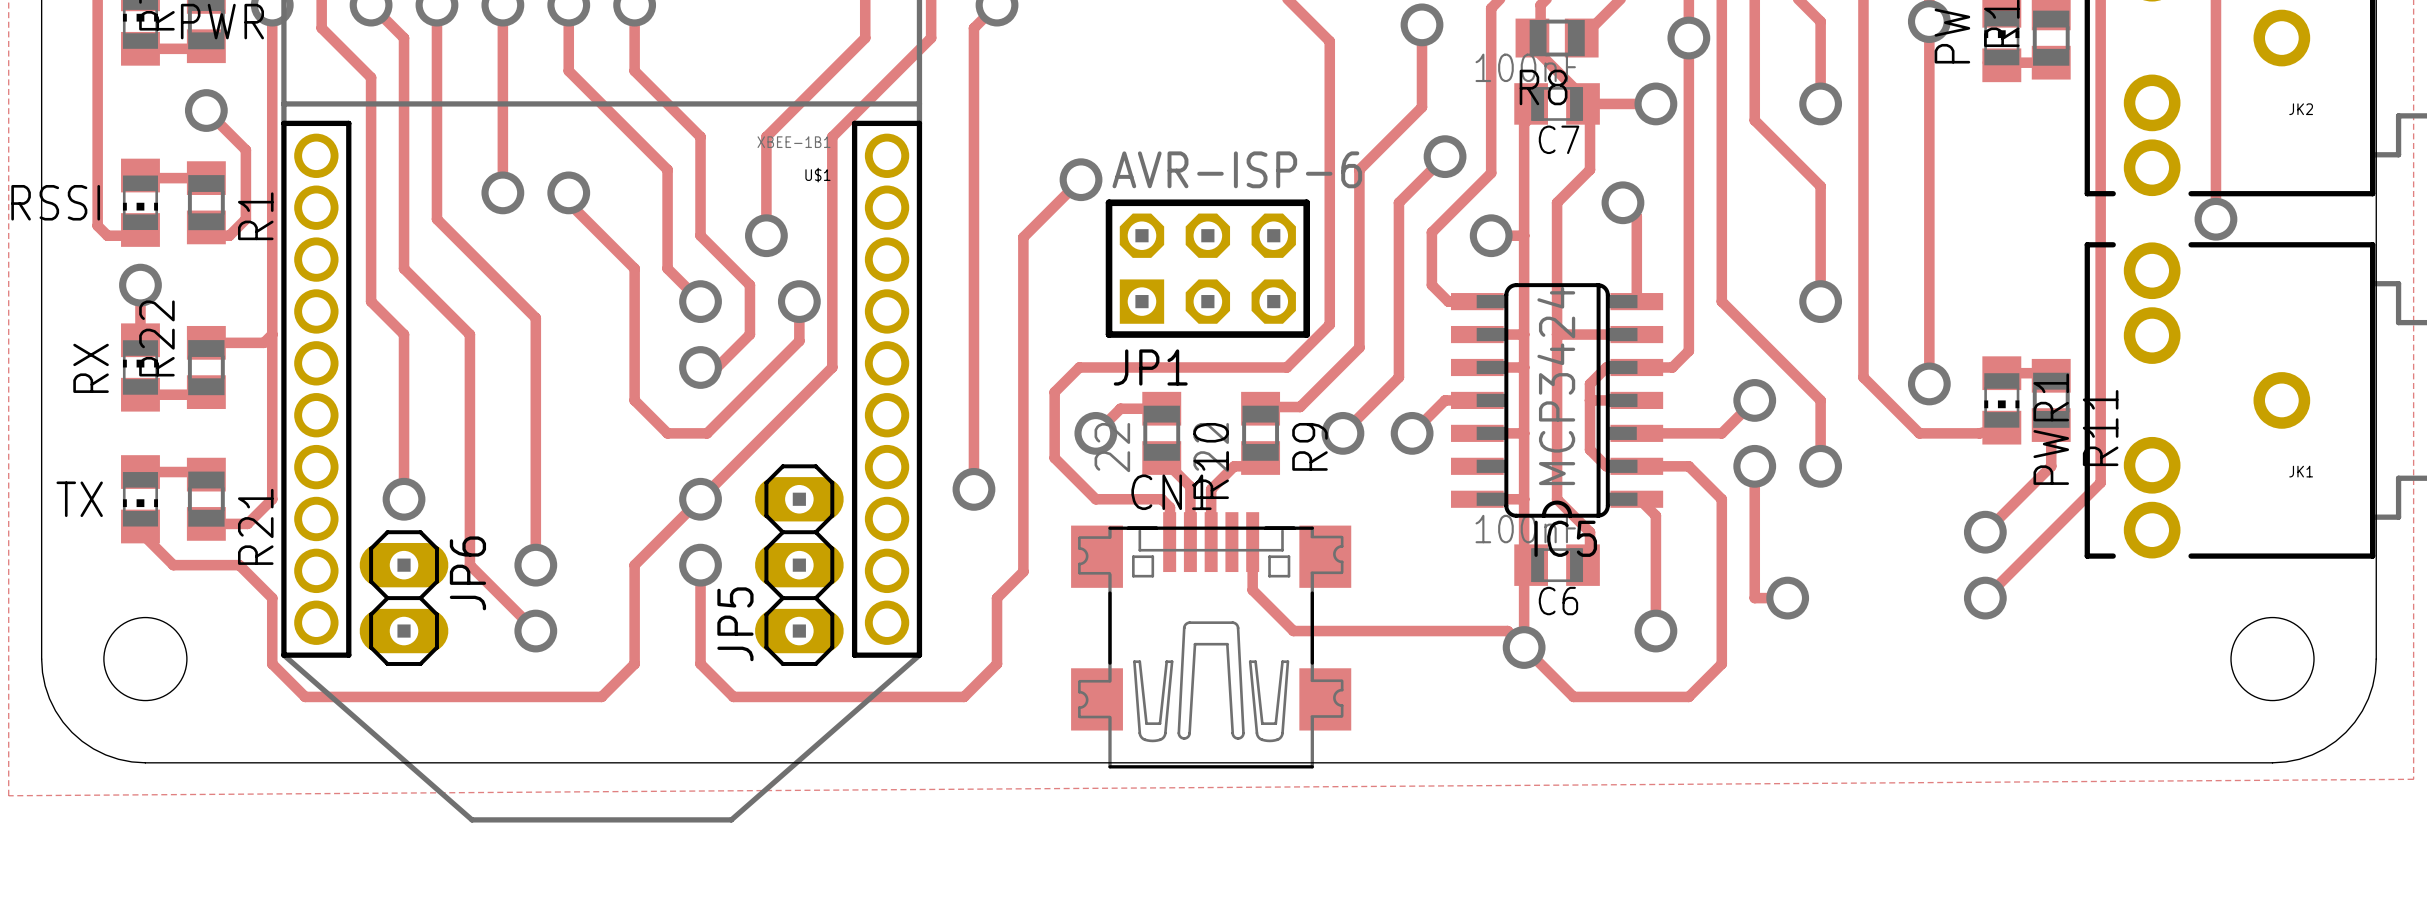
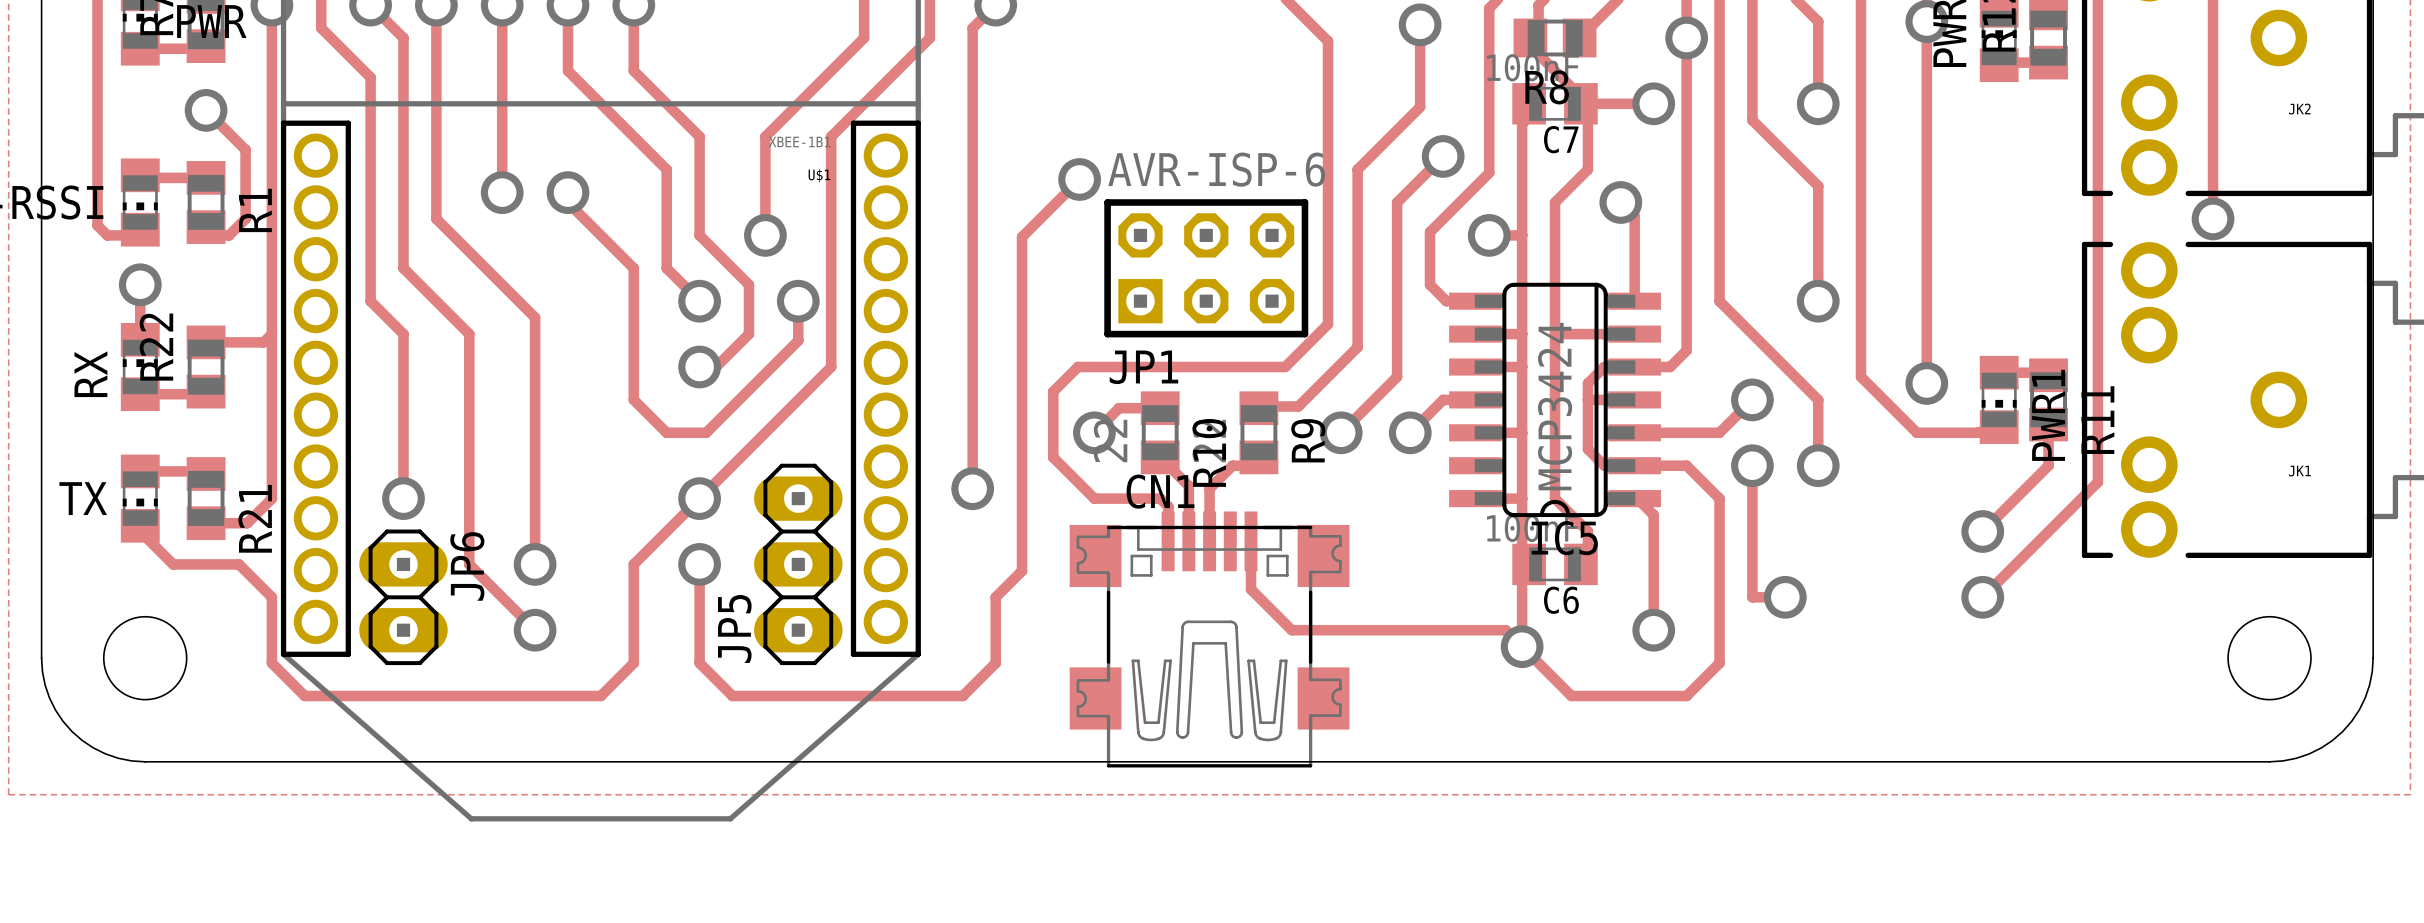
zone outline: (2413, 779) (8, 795) -> (2410, 778) (2410, 794) (8, 794)

